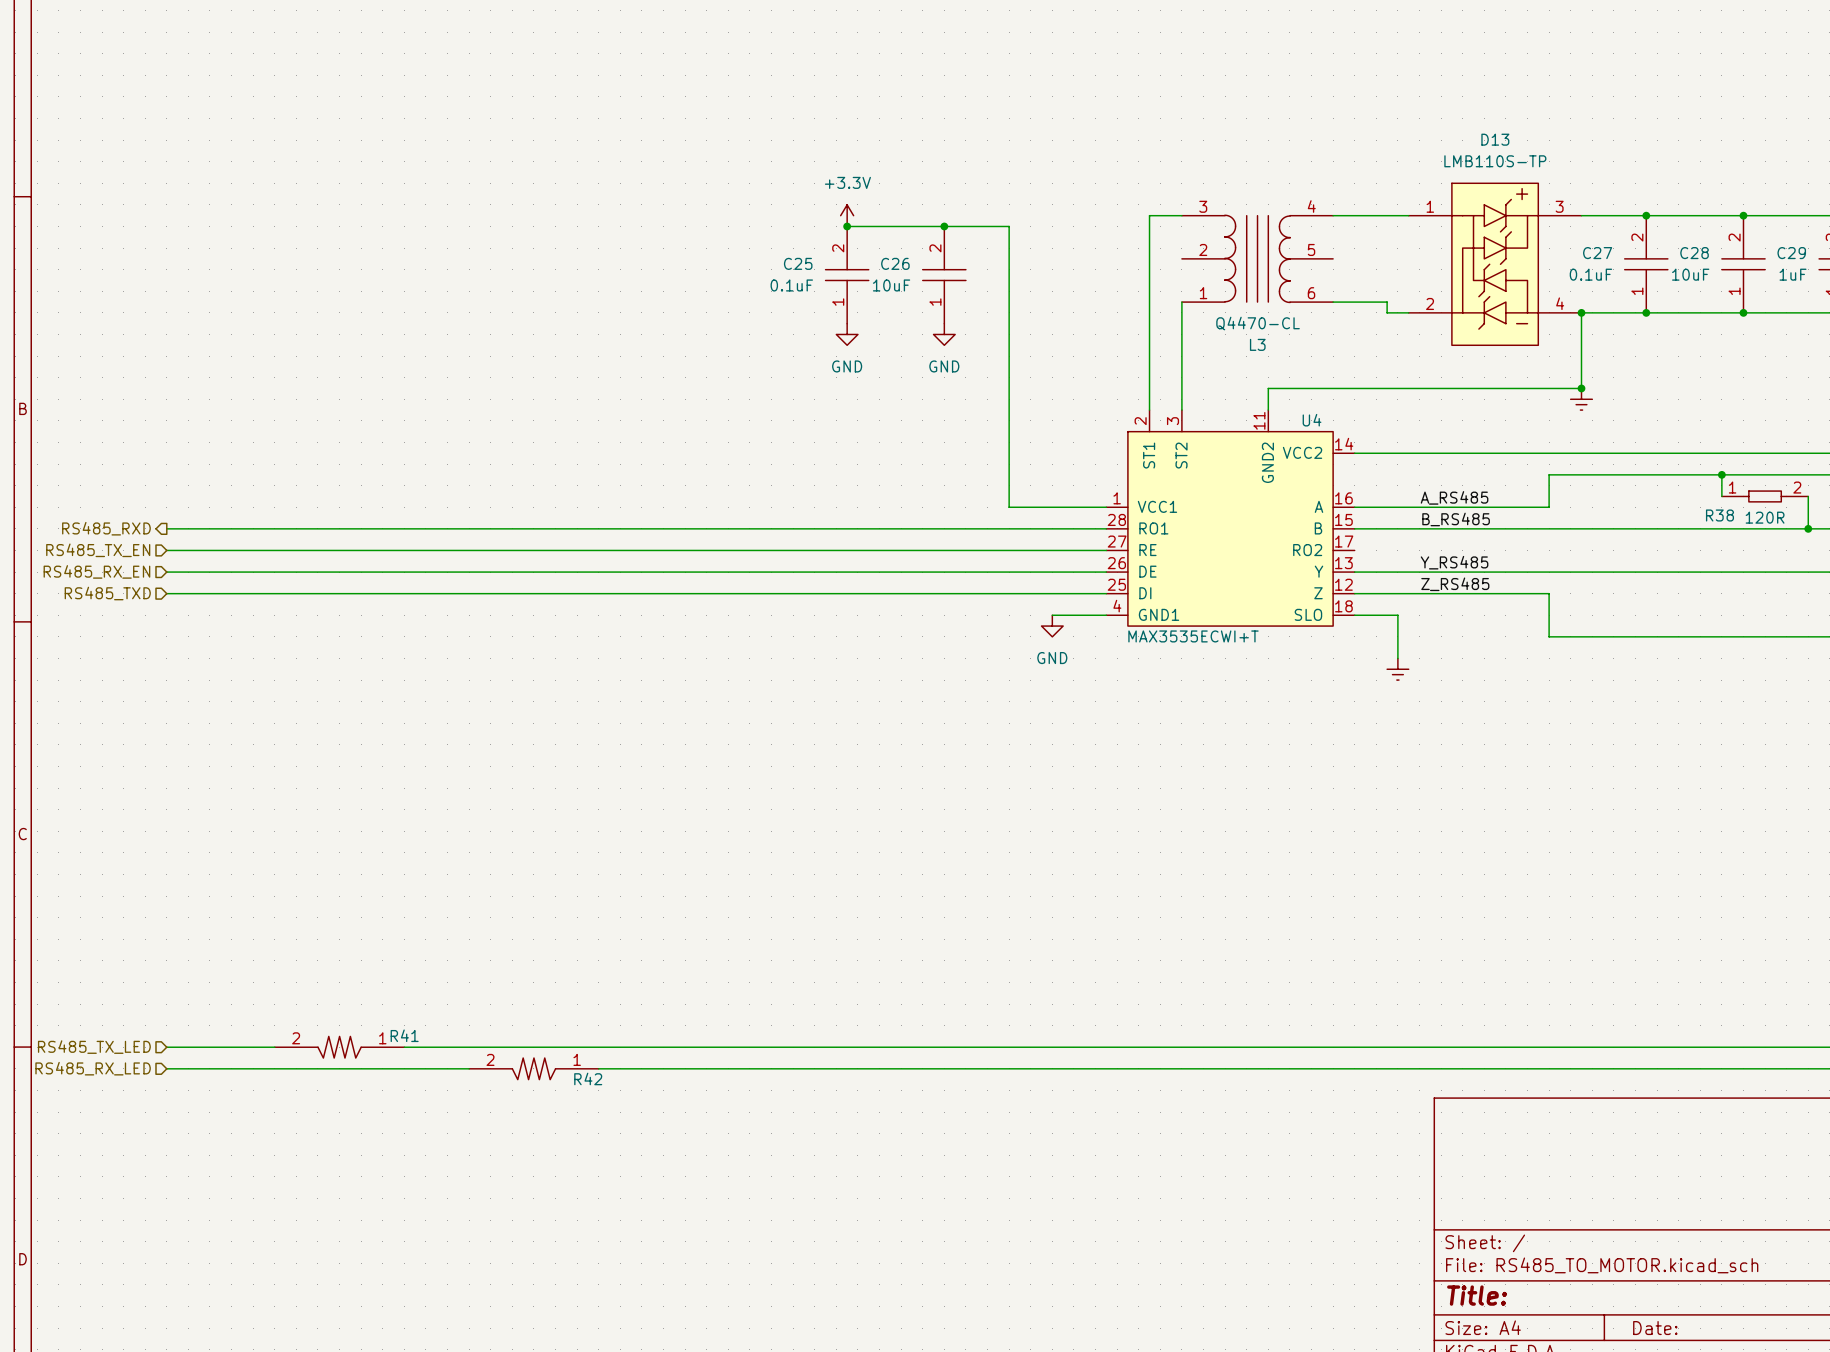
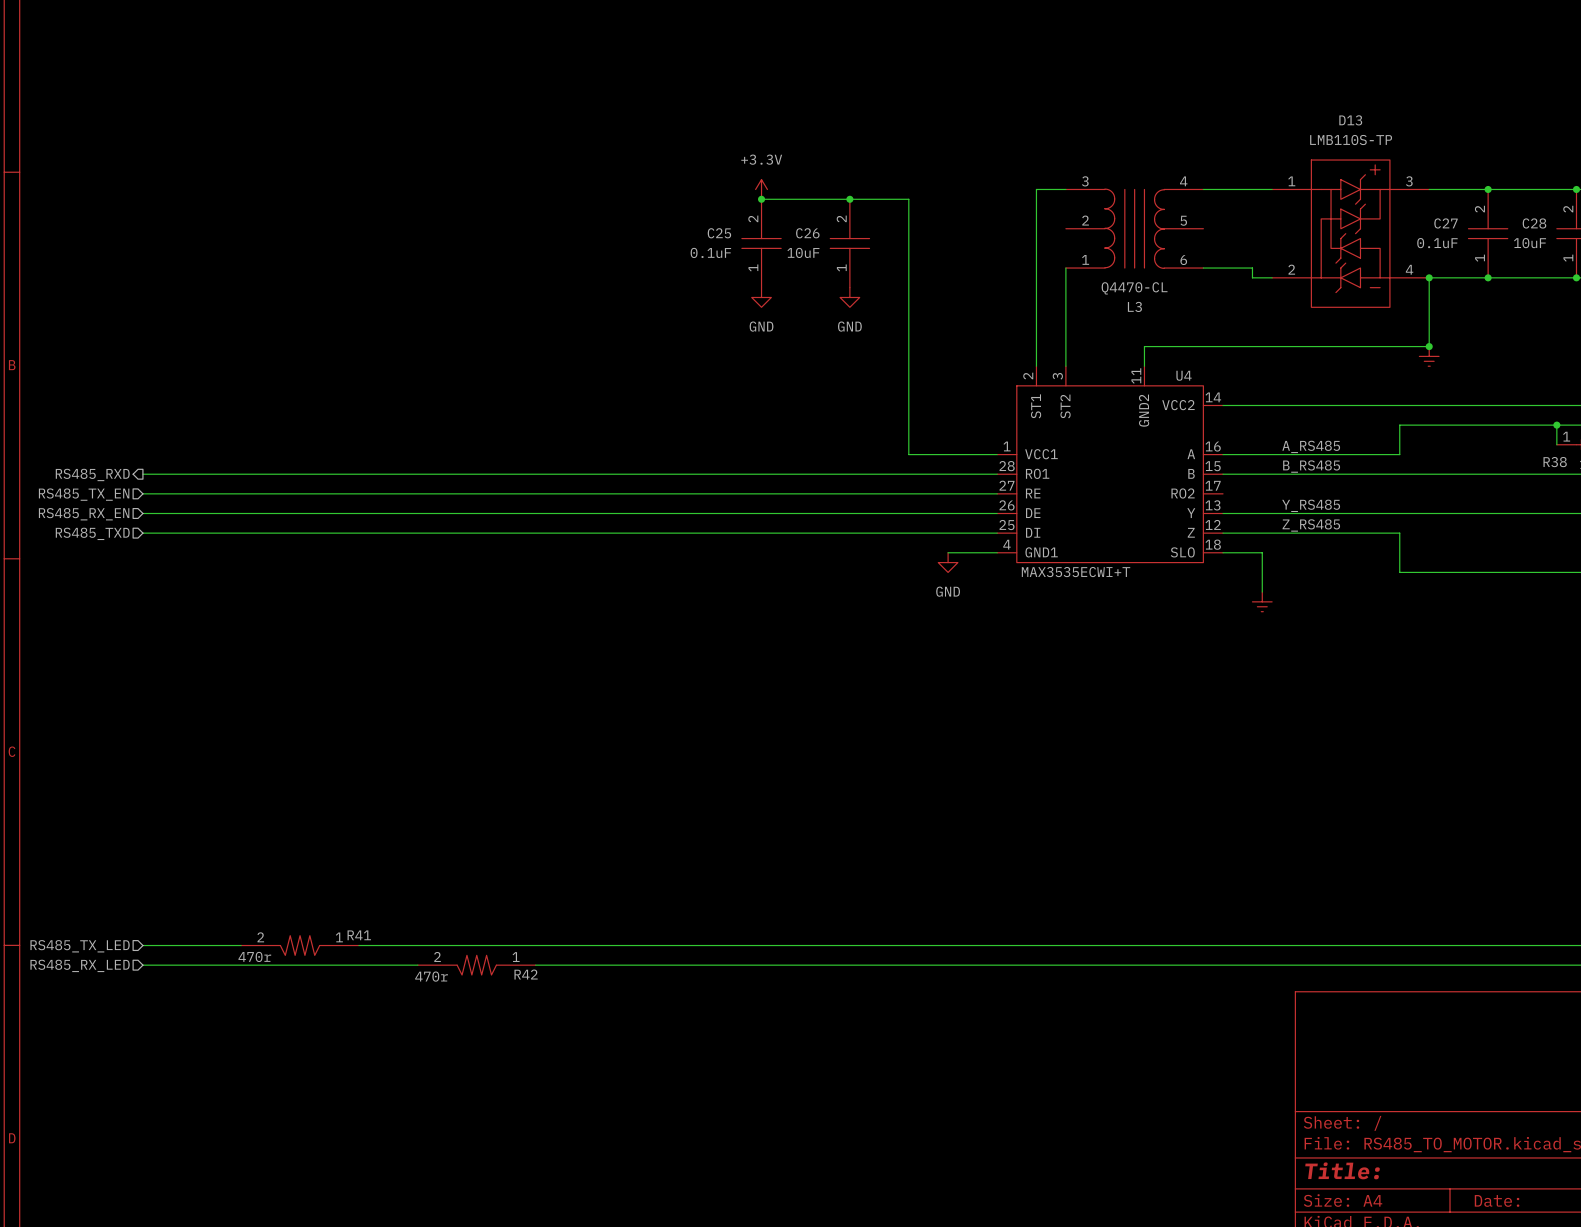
R41 text: none -> 470r (254, 956)
R42 text: none -> 470r (431, 976)

